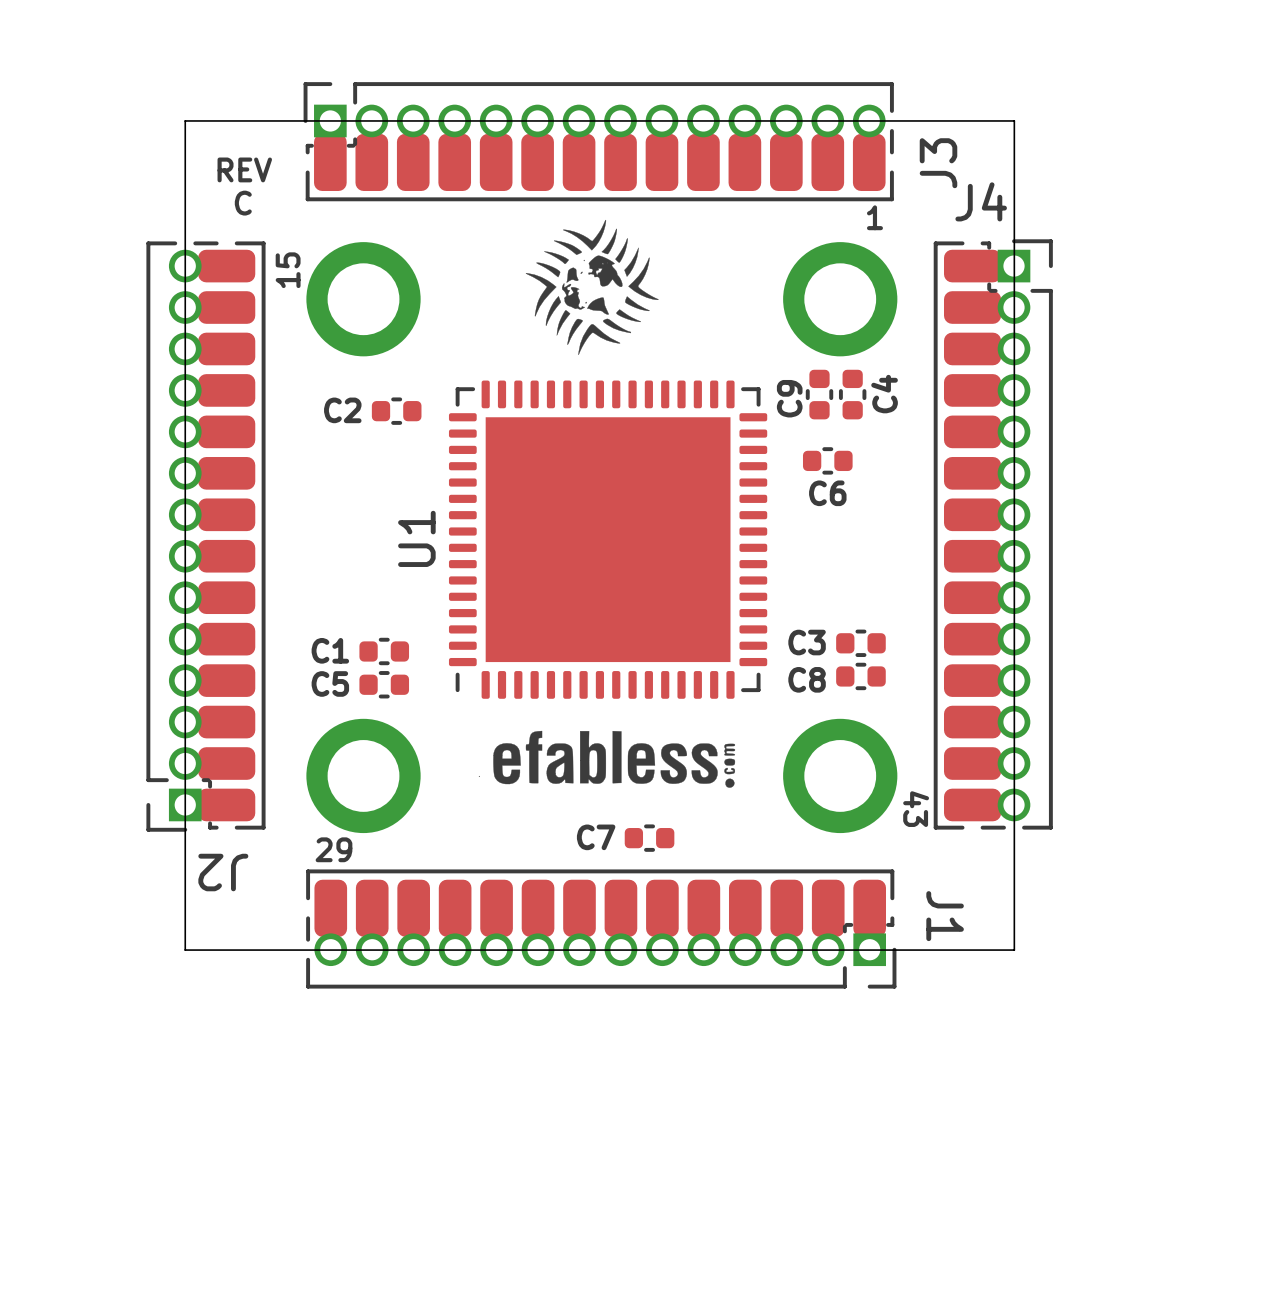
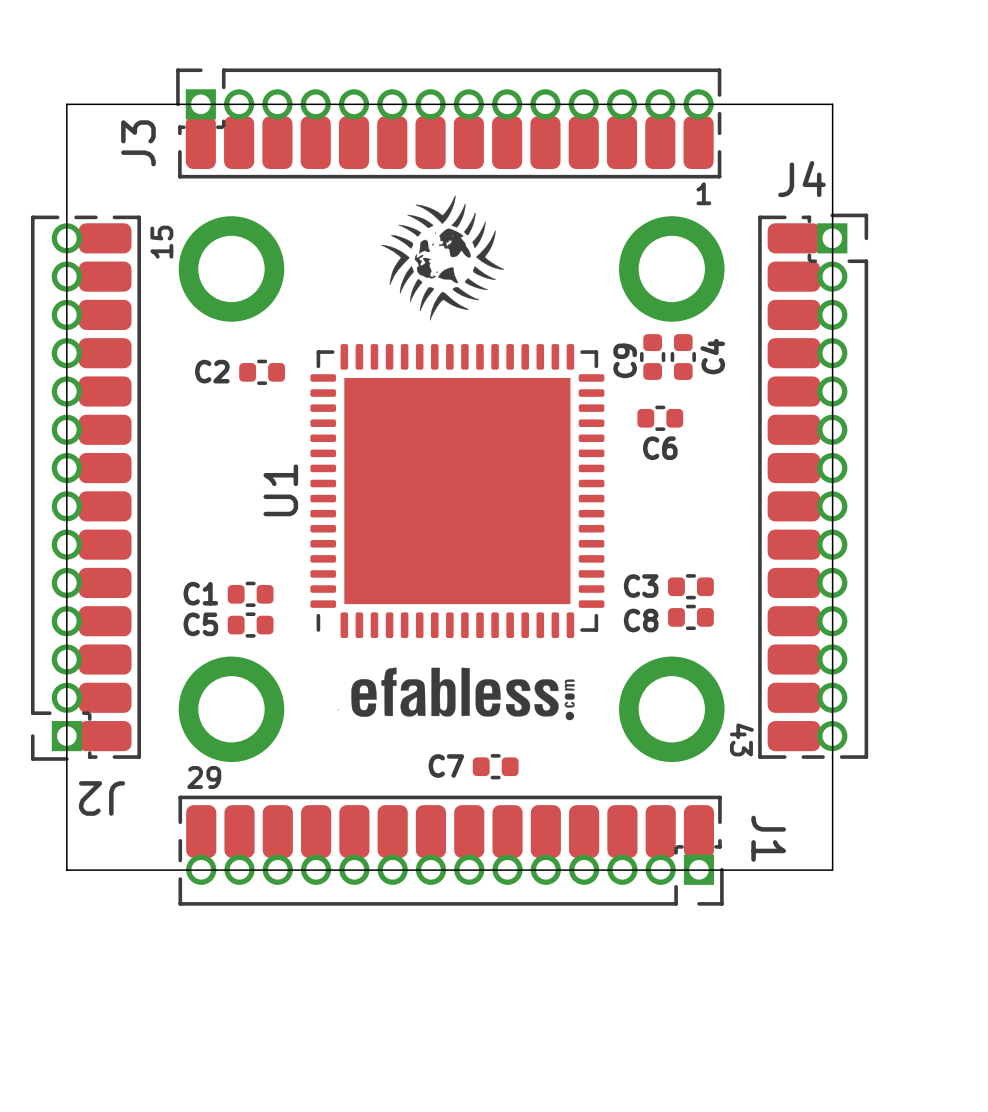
J3 name position: J3 (938, 163) -> J3 (138, 143)
text: REV (244, 169) -> none
text: C (243, 203) -> none

